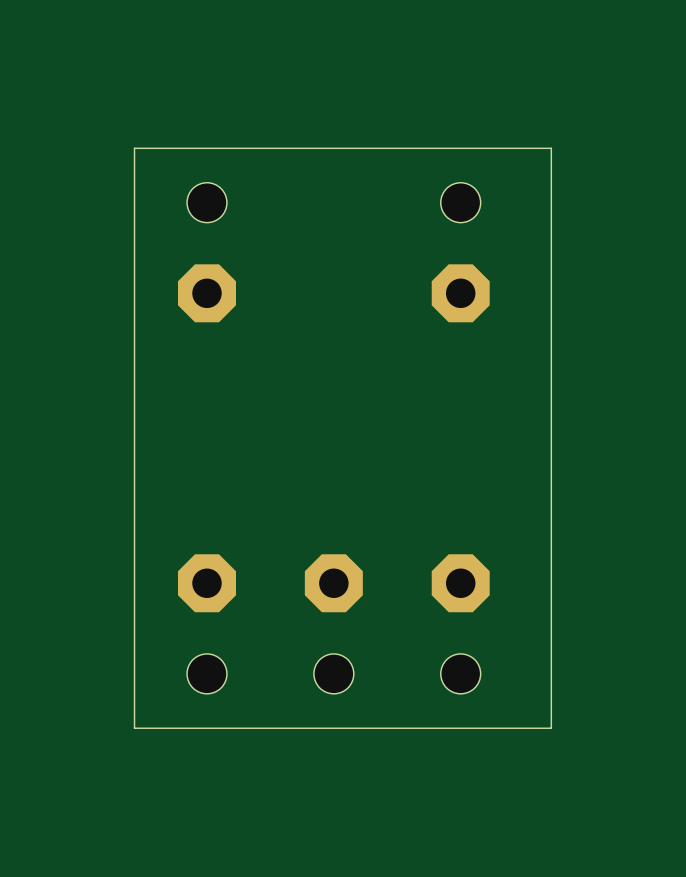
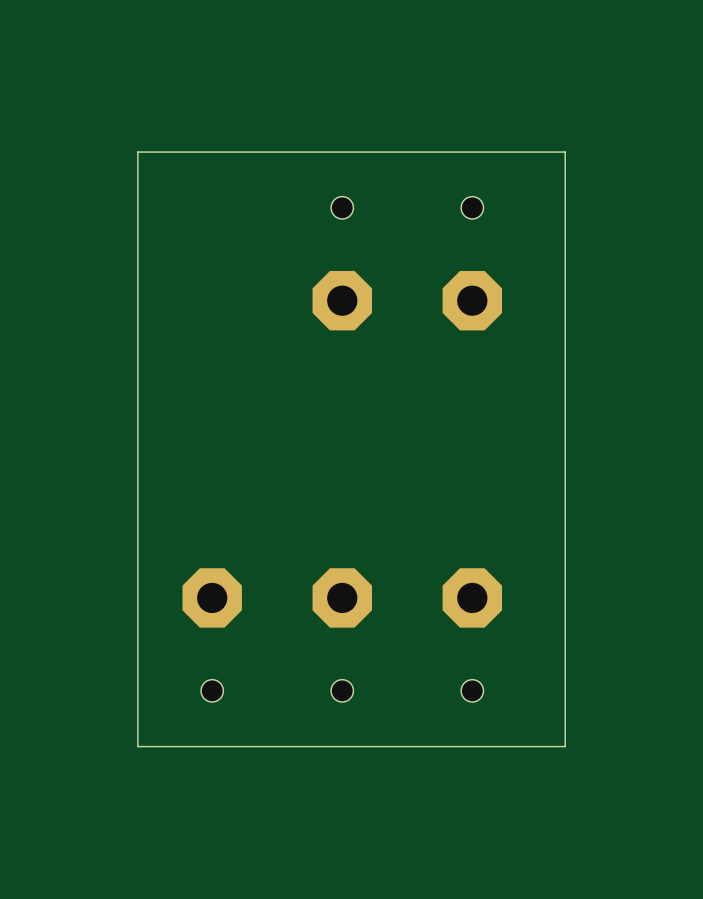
hole size: [440, 182, 481, 223] -> [461, 196, 484, 219]
hole: (207, 202) -> none
hole: none -> (342, 207)
part position: (207, 293) -> (342, 300)
hole size: [187, 653, 227, 694] -> [201, 679, 224, 703]
hole size: [313, 653, 354, 694] -> [331, 679, 354, 703]
hole size: [440, 653, 481, 694] -> [461, 679, 484, 703]

